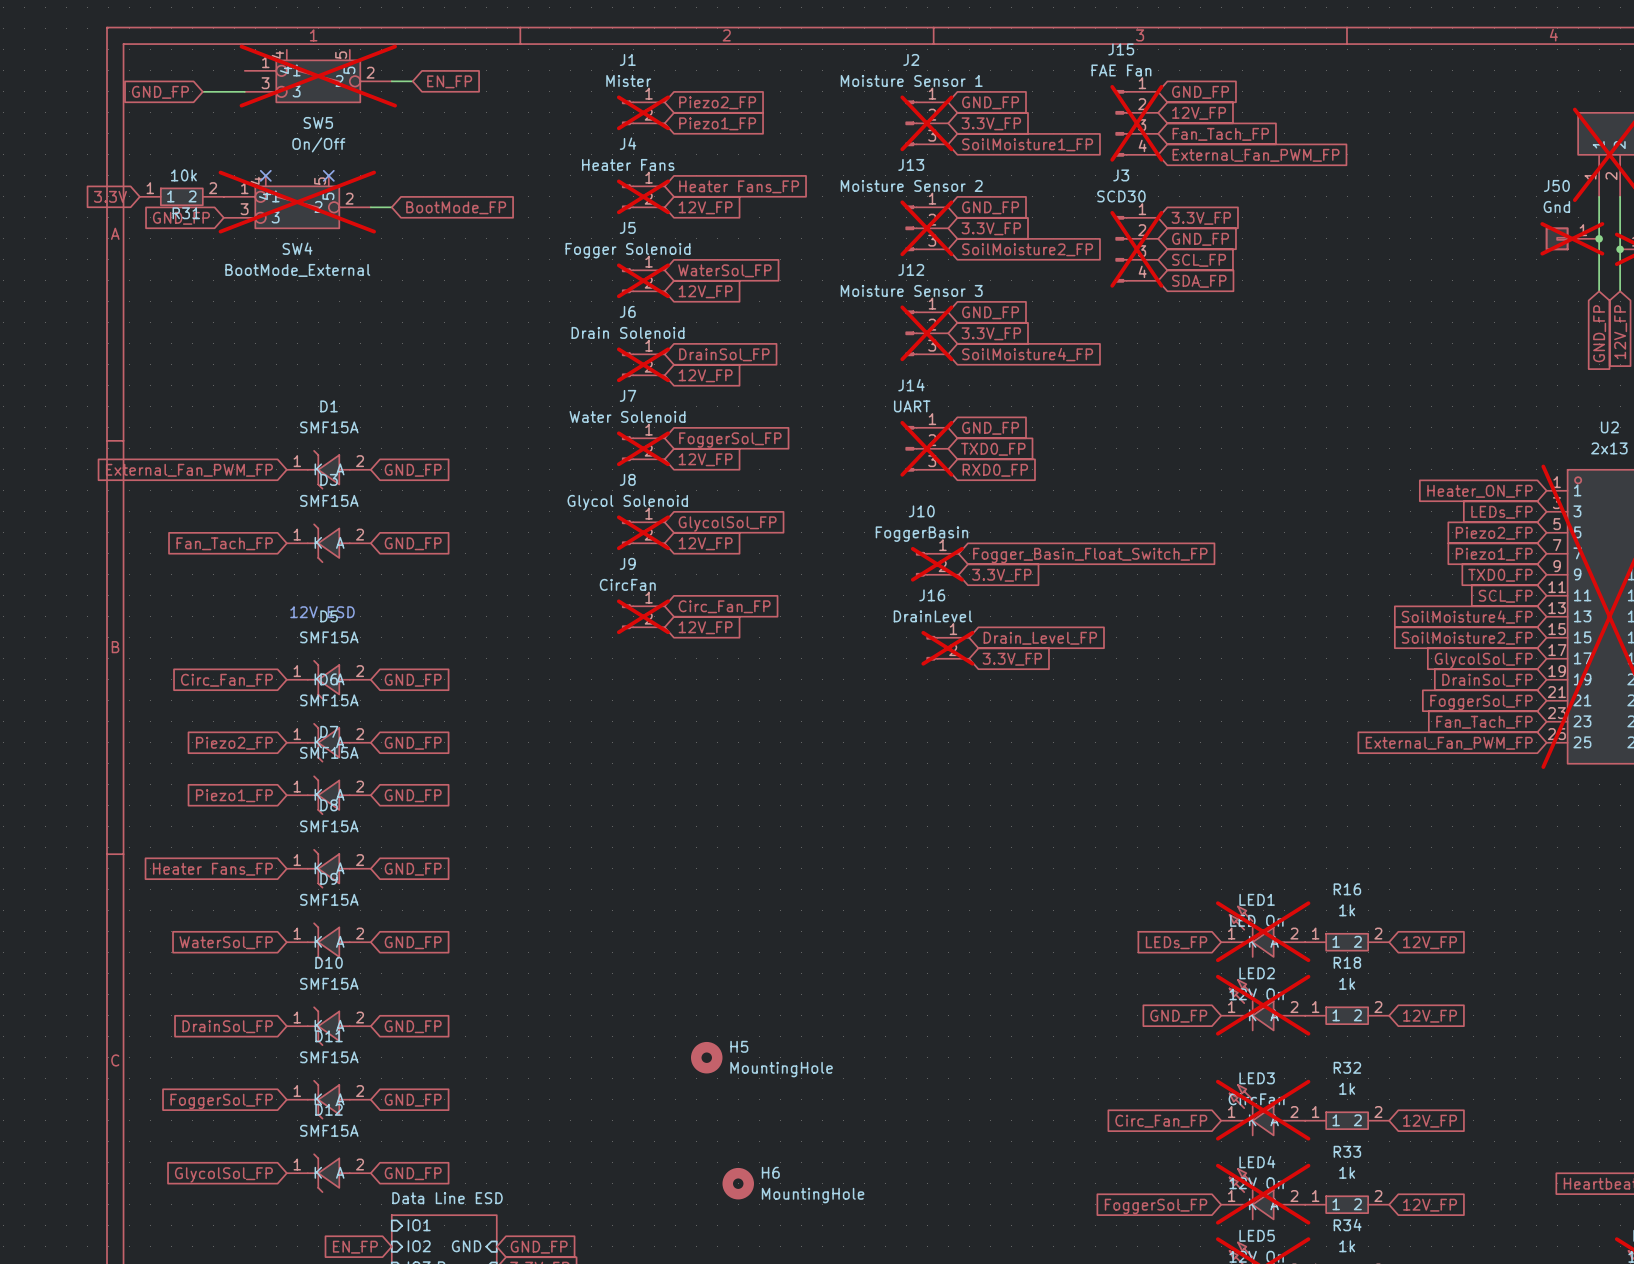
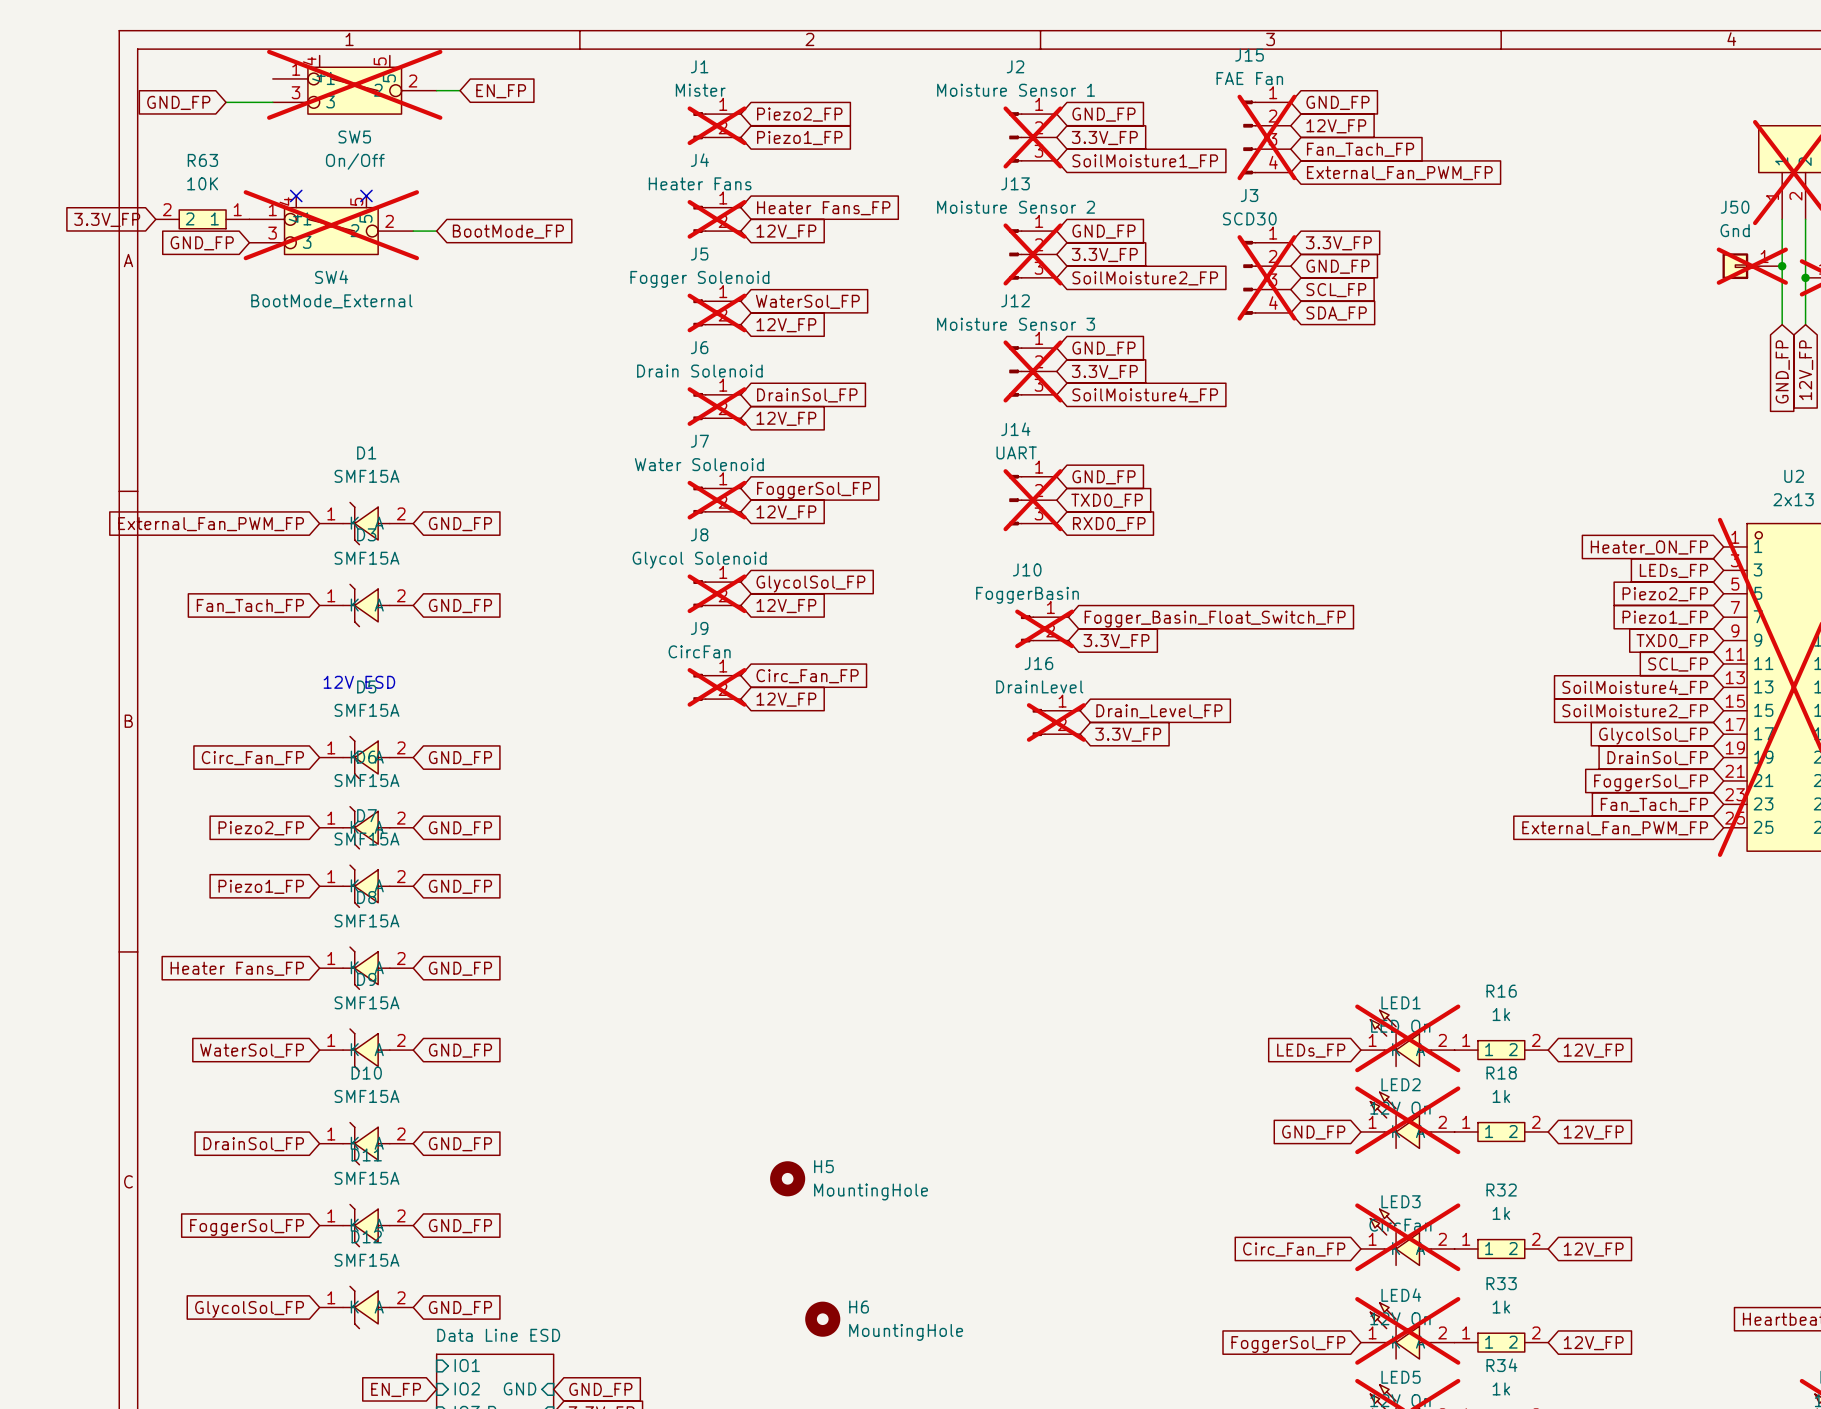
R31 value: 10k (183, 175) -> 10K (202, 183)
global label: 3.3V (110, 196) -> 3.3V_FP (107, 219)
R31 rotation: 0° (181, 196) -> 180° (202, 219)
R31 name: R31 (186, 213) -> R63 (202, 160)

